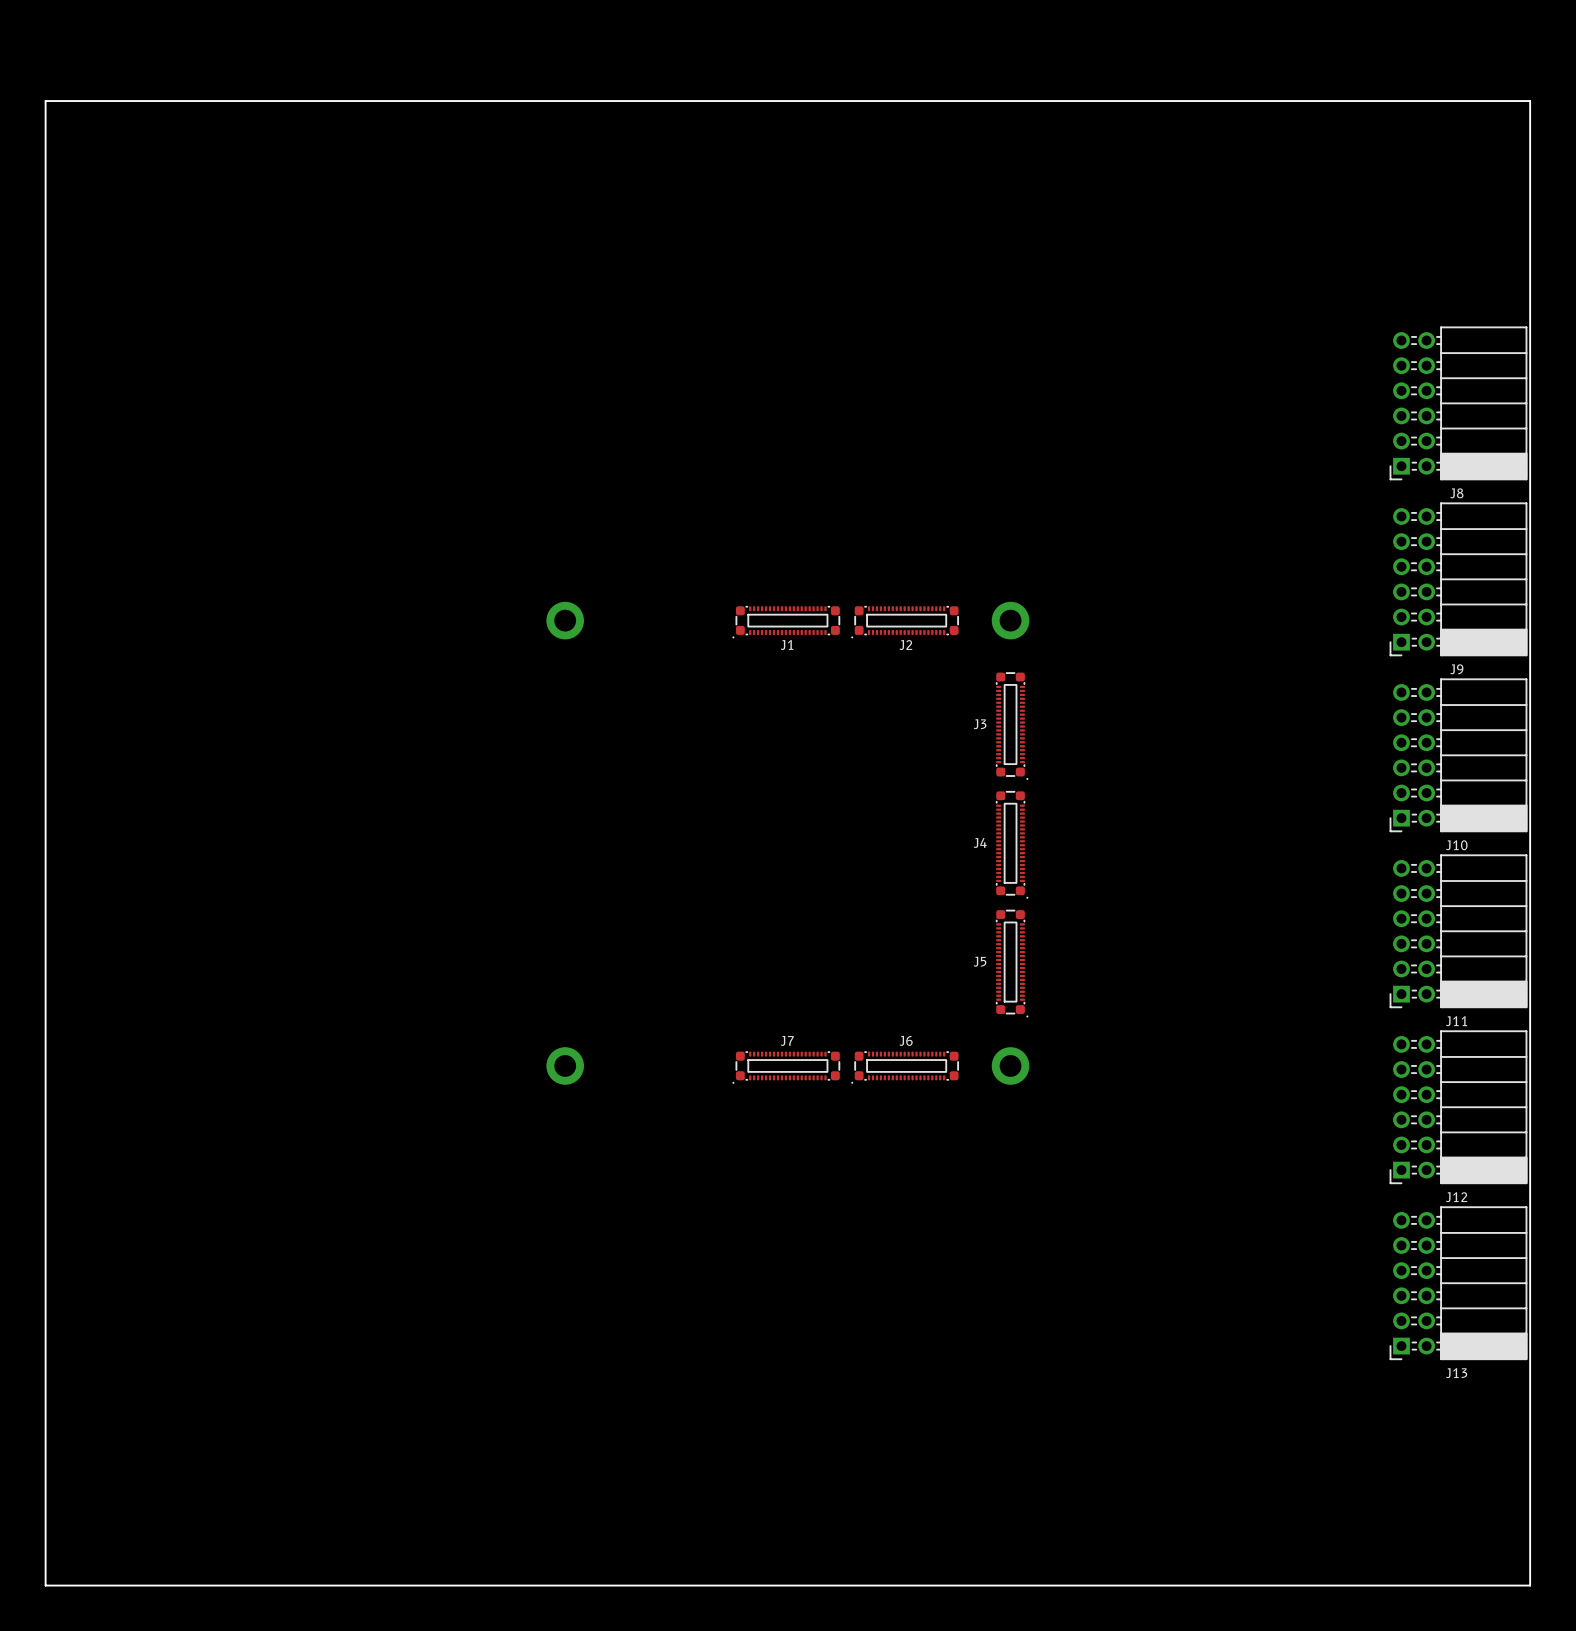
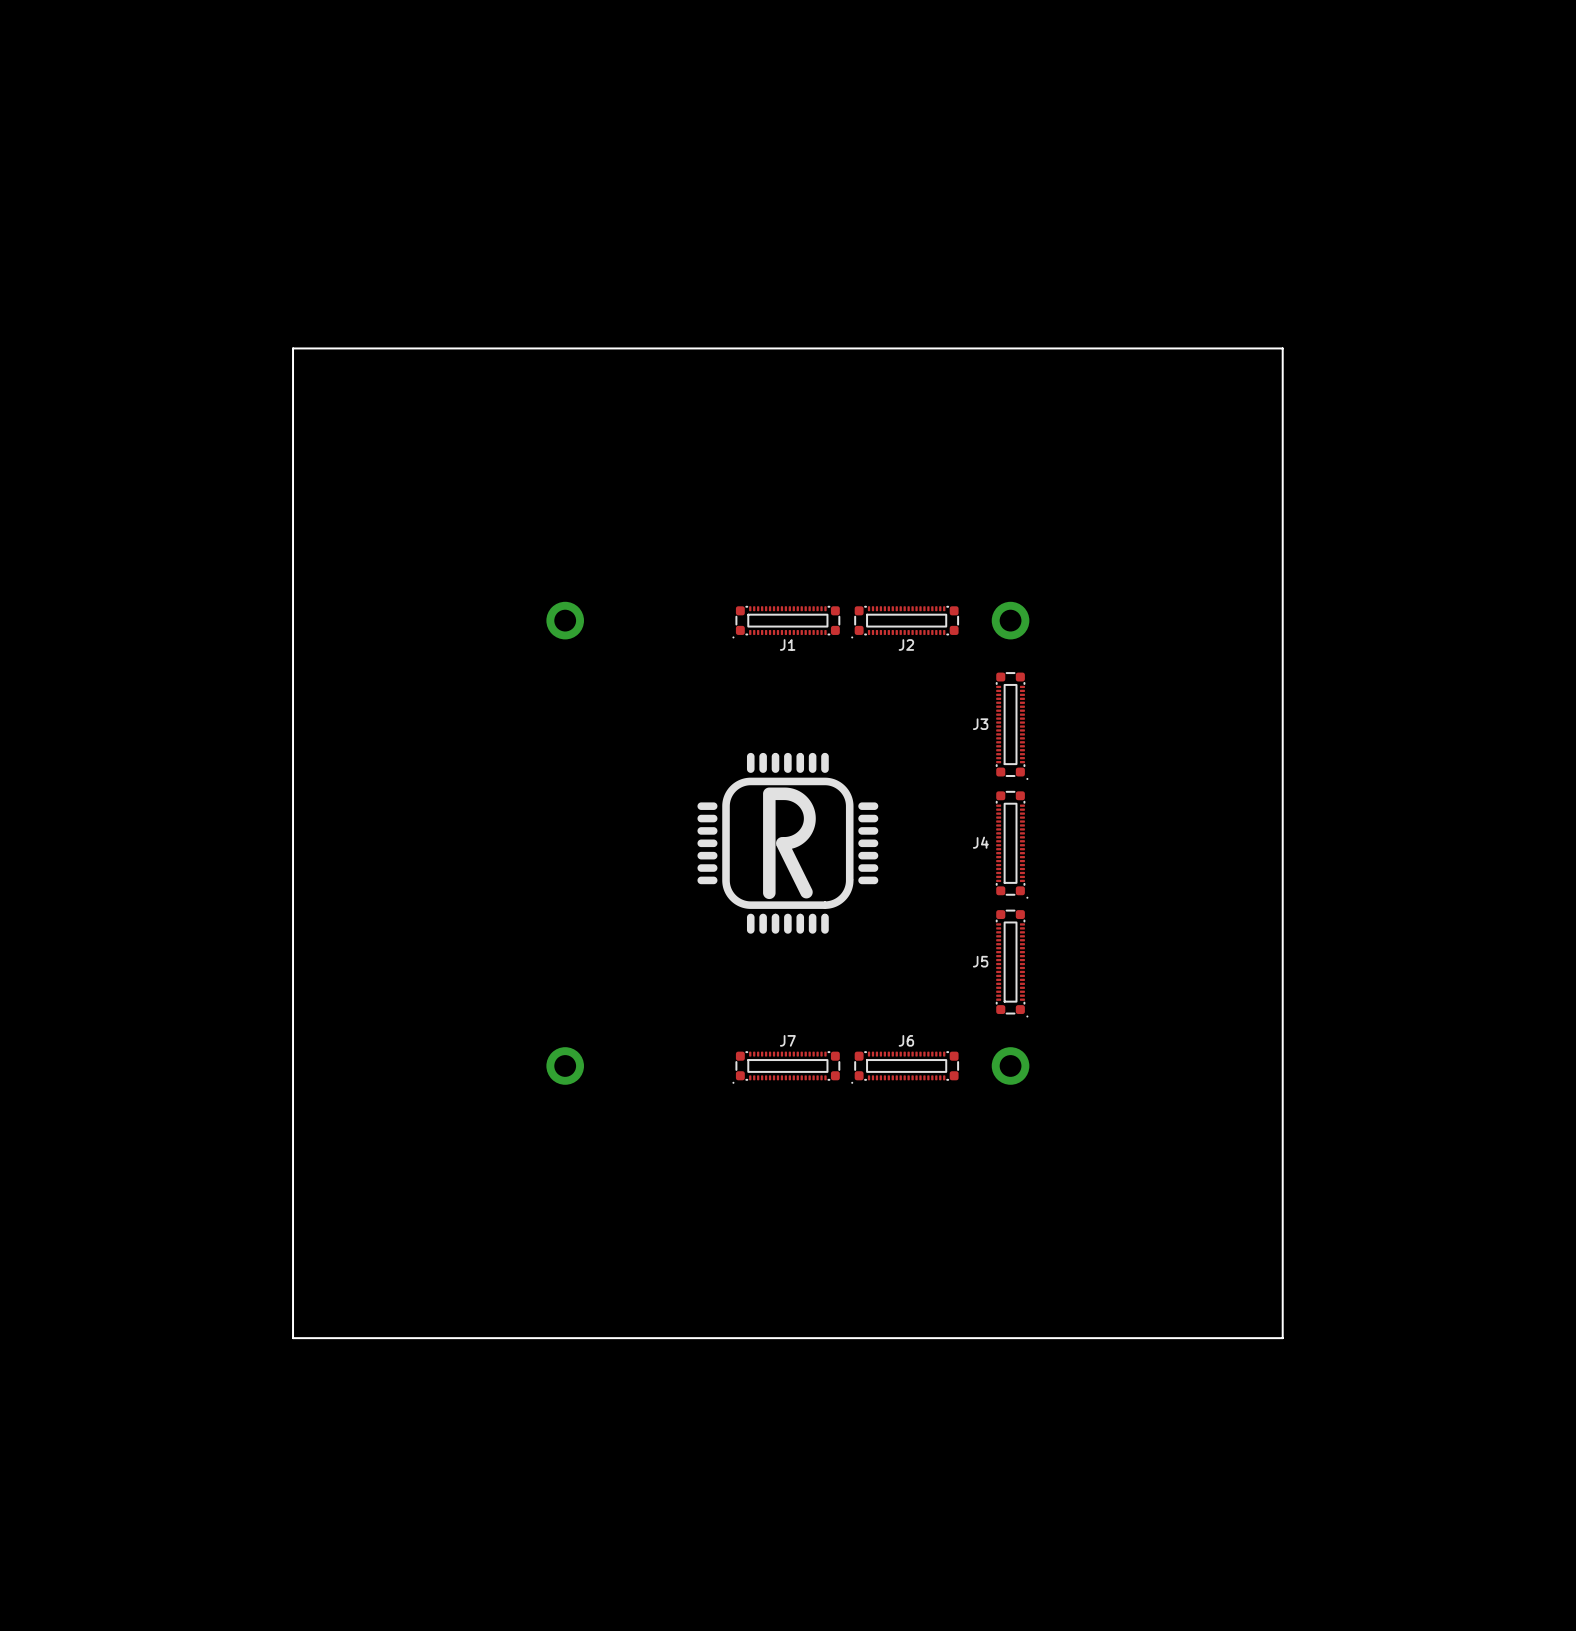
board edge: (45, 101) (1530, 101) (1530, 1585) (45, 1585) (45, 101) -> none
board edge: none -> (293, 348) (1282, 348) (1282, 1338) (293, 1338) (293, 348)
J8: (1458, 403) -> none
J9: (1458, 579) -> none
drawing: none -> [697, 752, 879, 934]
J10: (1458, 755) -> none
J11: (1458, 931) -> none
J12: (1458, 1107) -> none
J13: (1458, 1283) -> none

